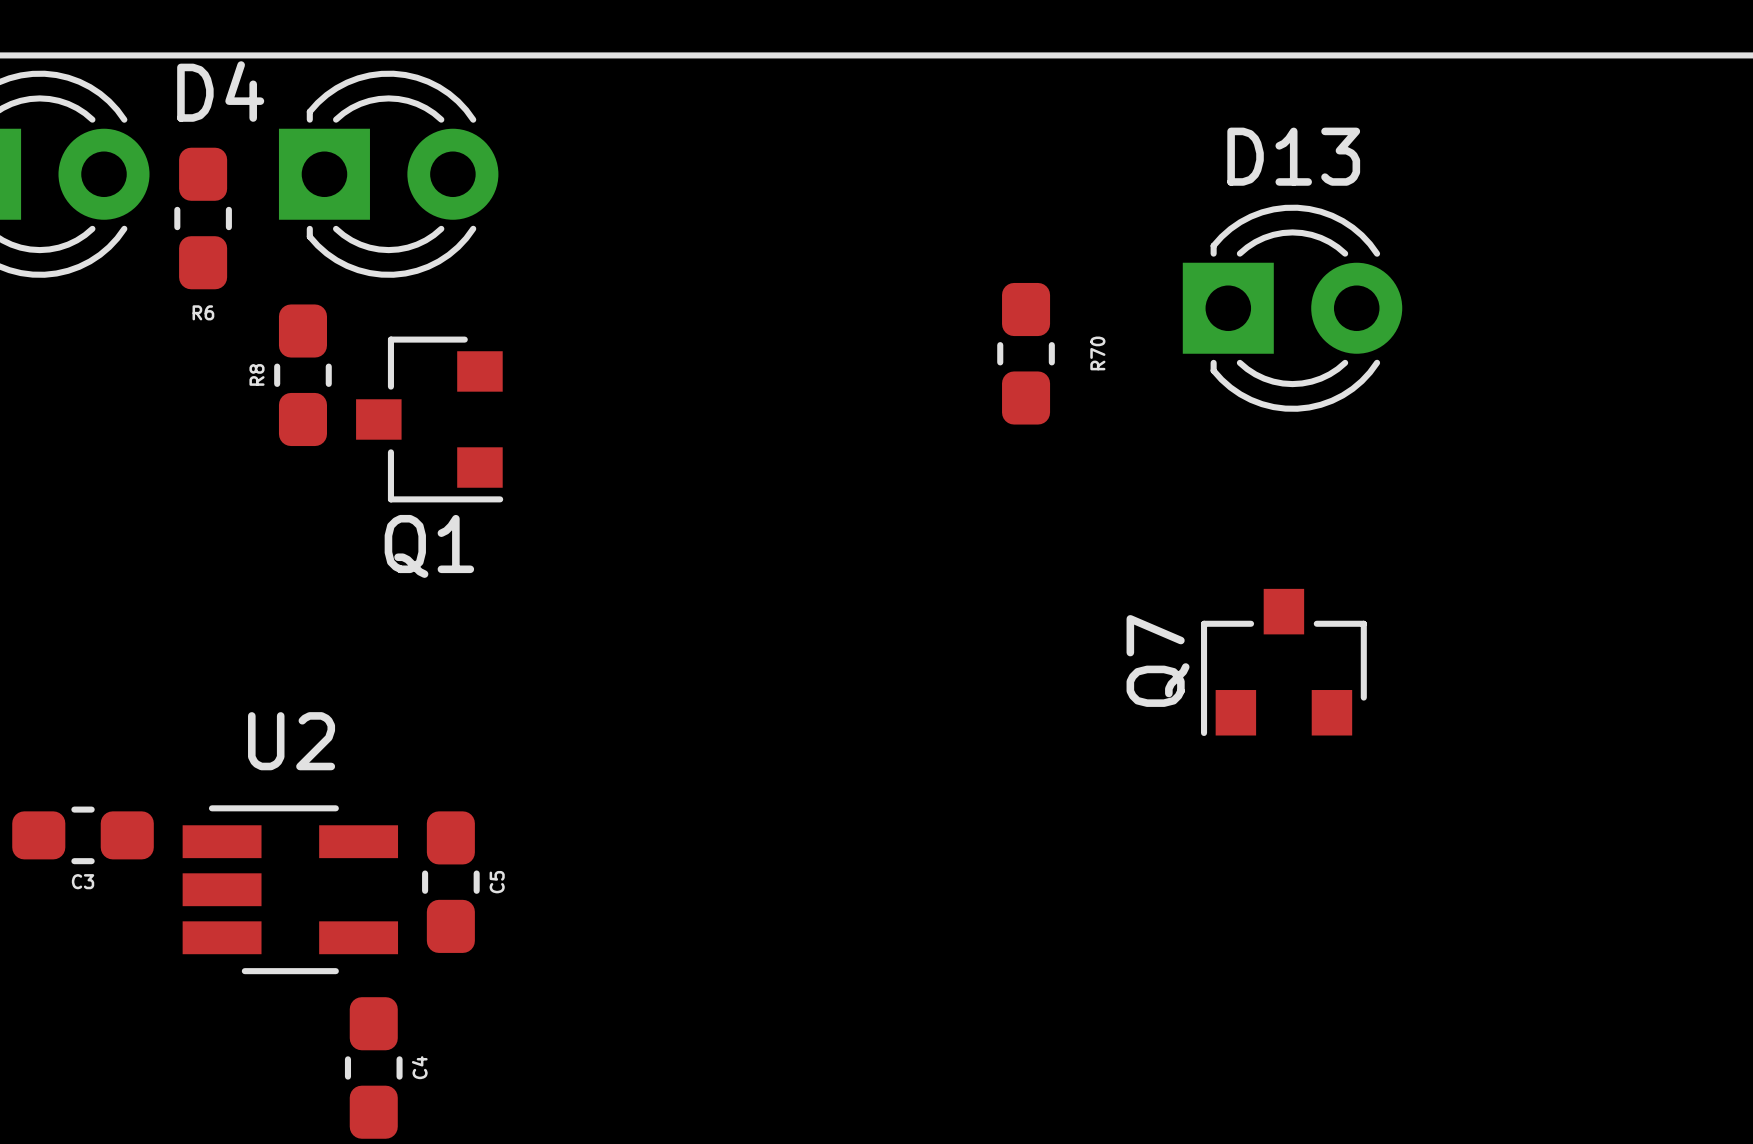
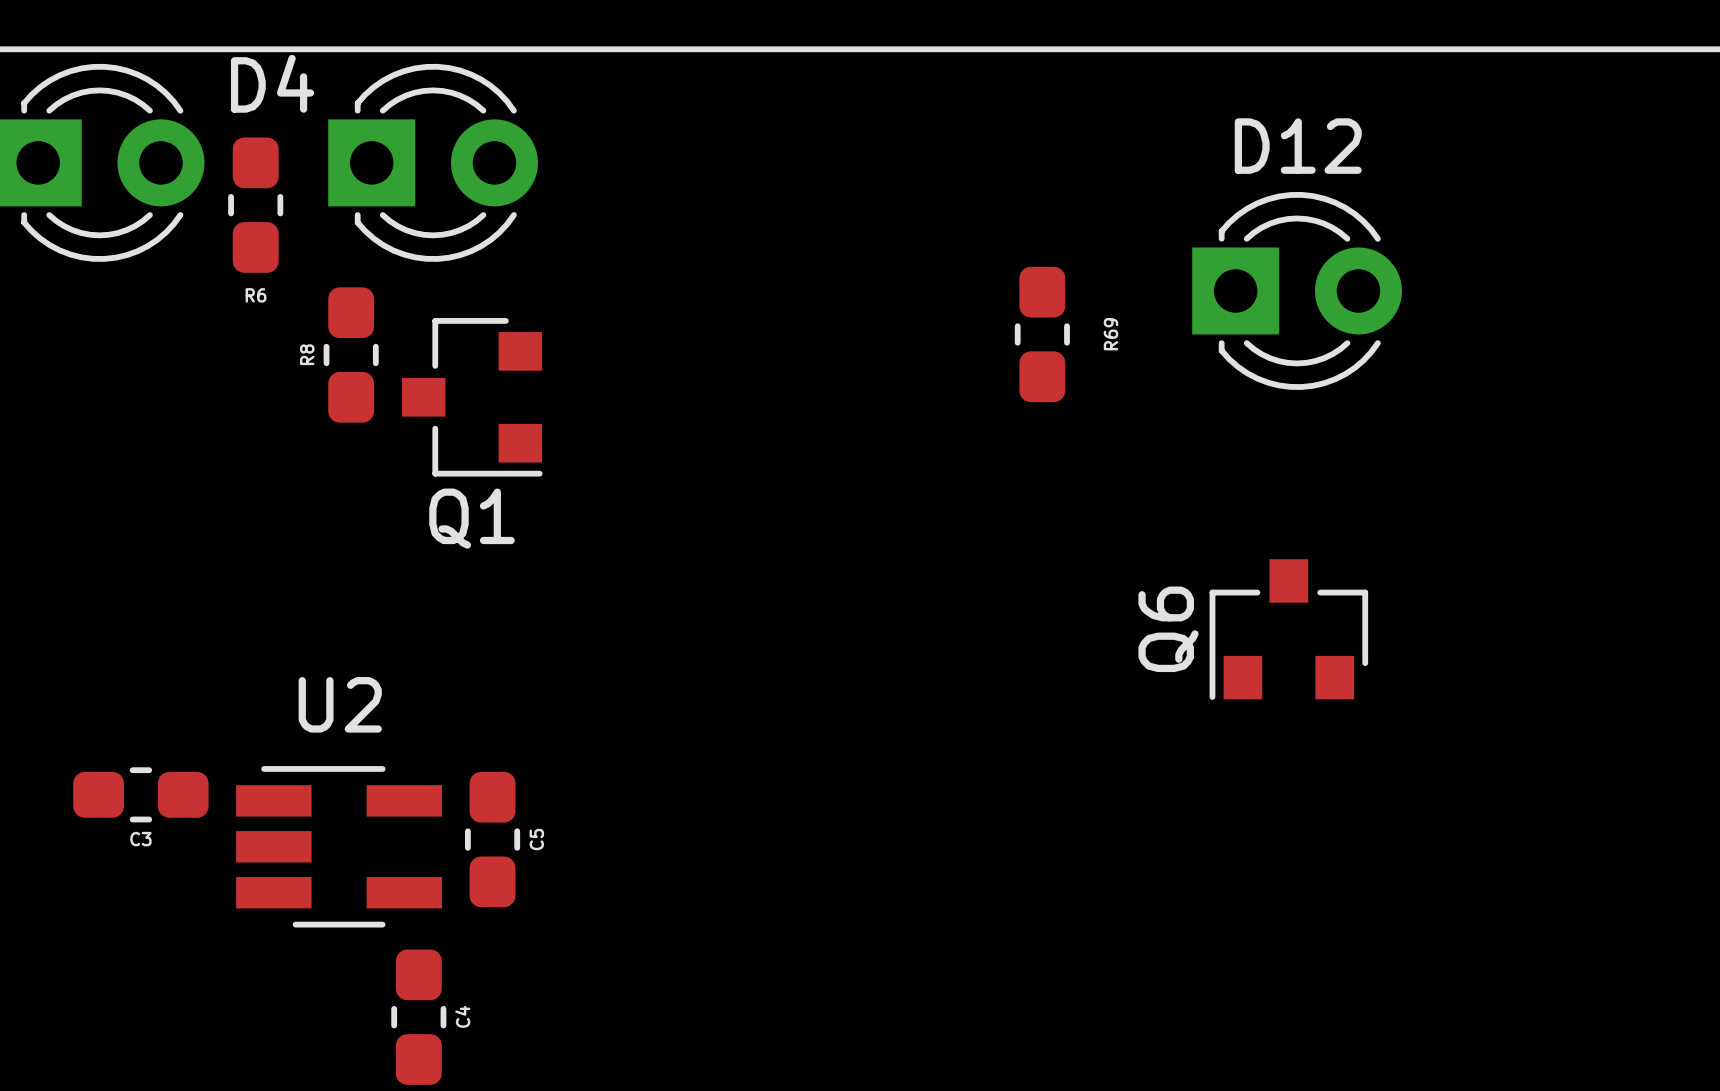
D13 name: D13 (1293, 156) -> D12 (1298, 146)
R70 name: R70 (1097, 353) -> R69 (1111, 334)
Q7 name: Q7 (1158, 660) -> Q6 (1168, 629)

